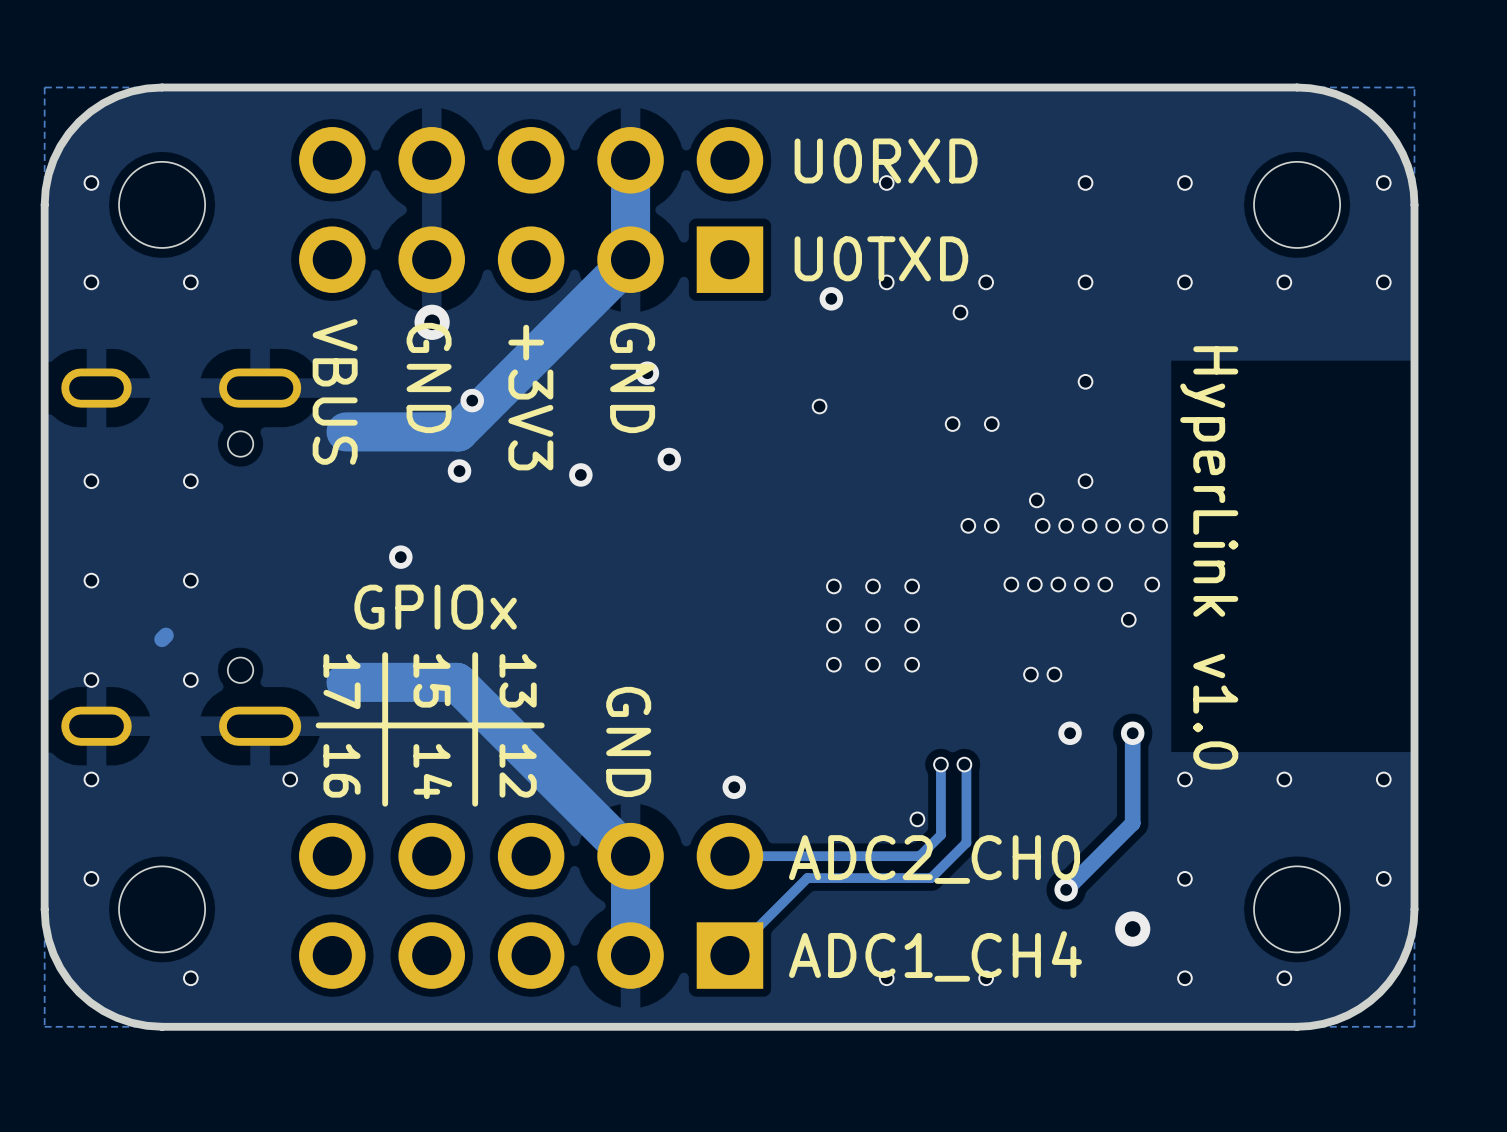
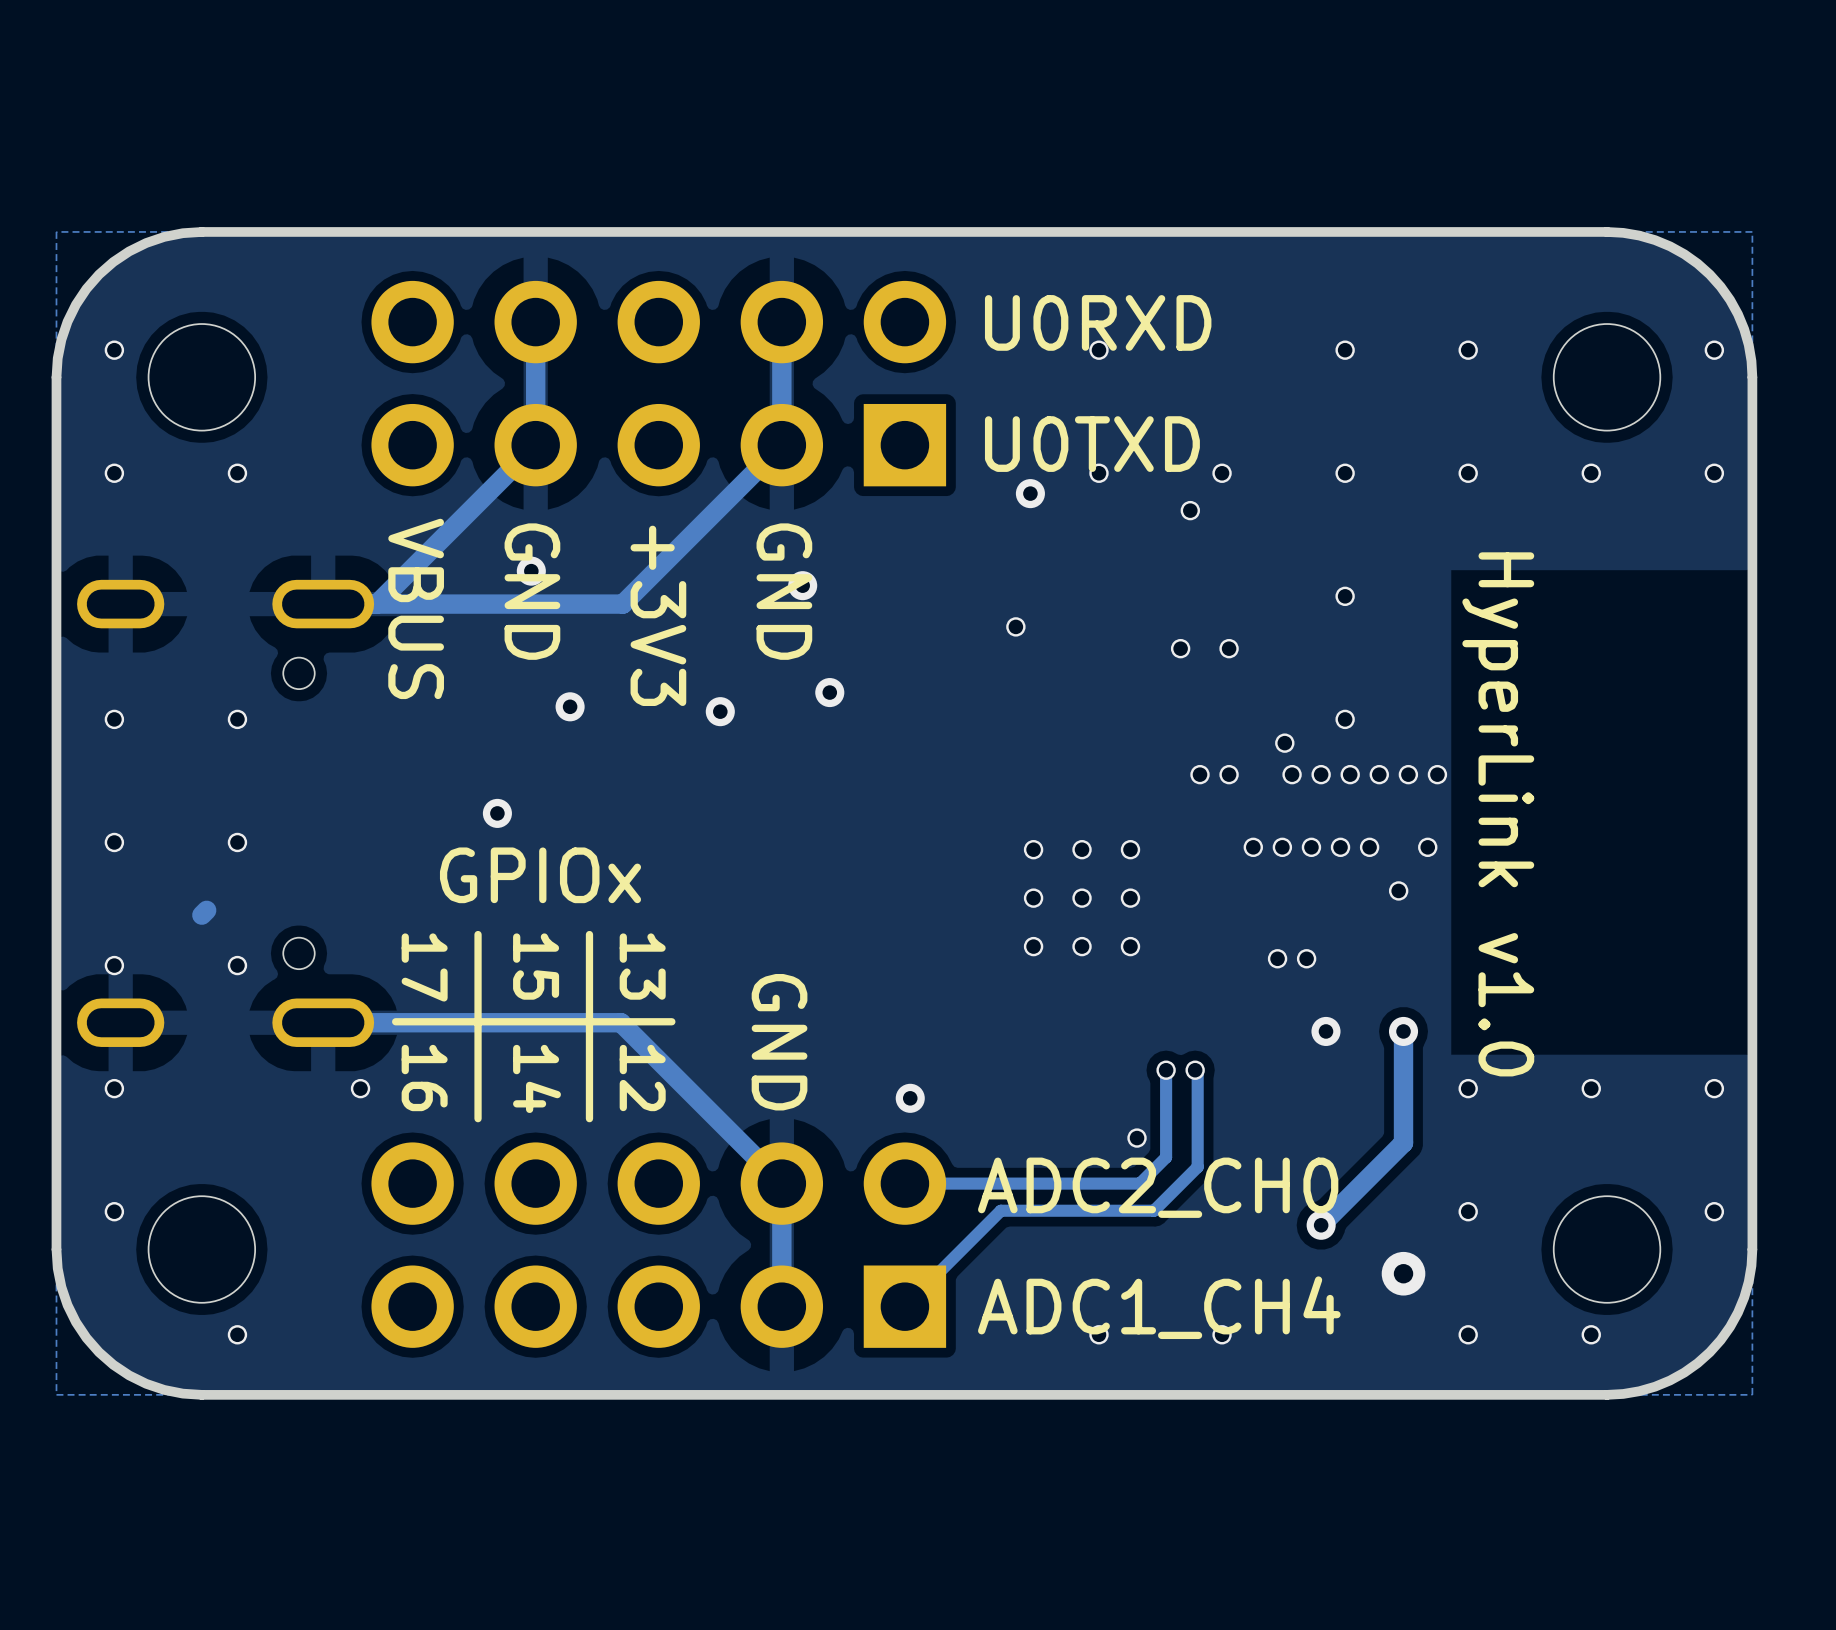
track: none -> (535, 322) (535, 445) (376, 604)
track width: thick (630, 160) (630, 259) (502, 388) -> thin (781, 322) (781, 445) (622, 604)
via: (432, 322) -> none
track: (502, 388) (458, 431) (346, 431) -> (622, 604) (323, 604)
via position: (472, 400) -> (531, 571)
track: (346, 682) (456, 682) (500, 726) -> (323, 1022) (620, 1022)
track width: thick (500, 726) (630, 856) (630, 955) -> thin (620, 1022) (781, 1183) (781, 1306)

